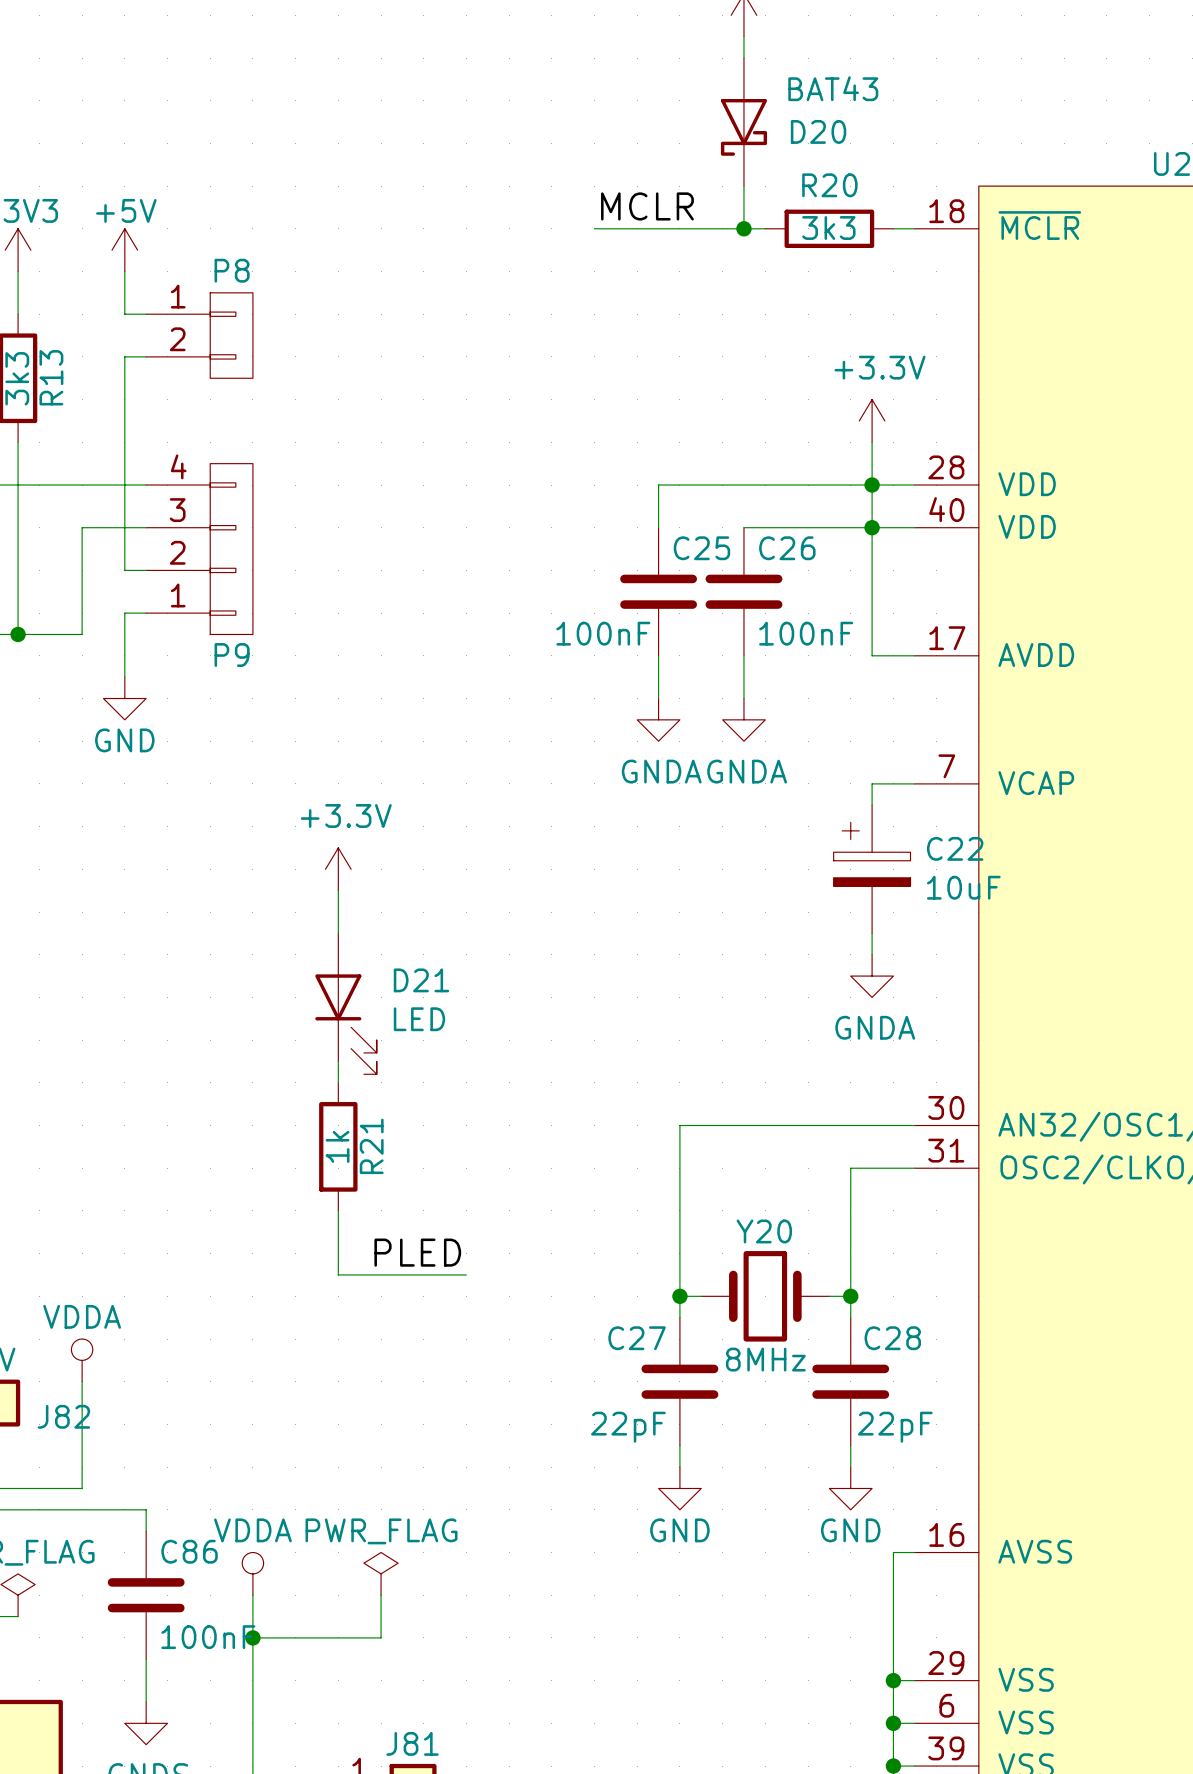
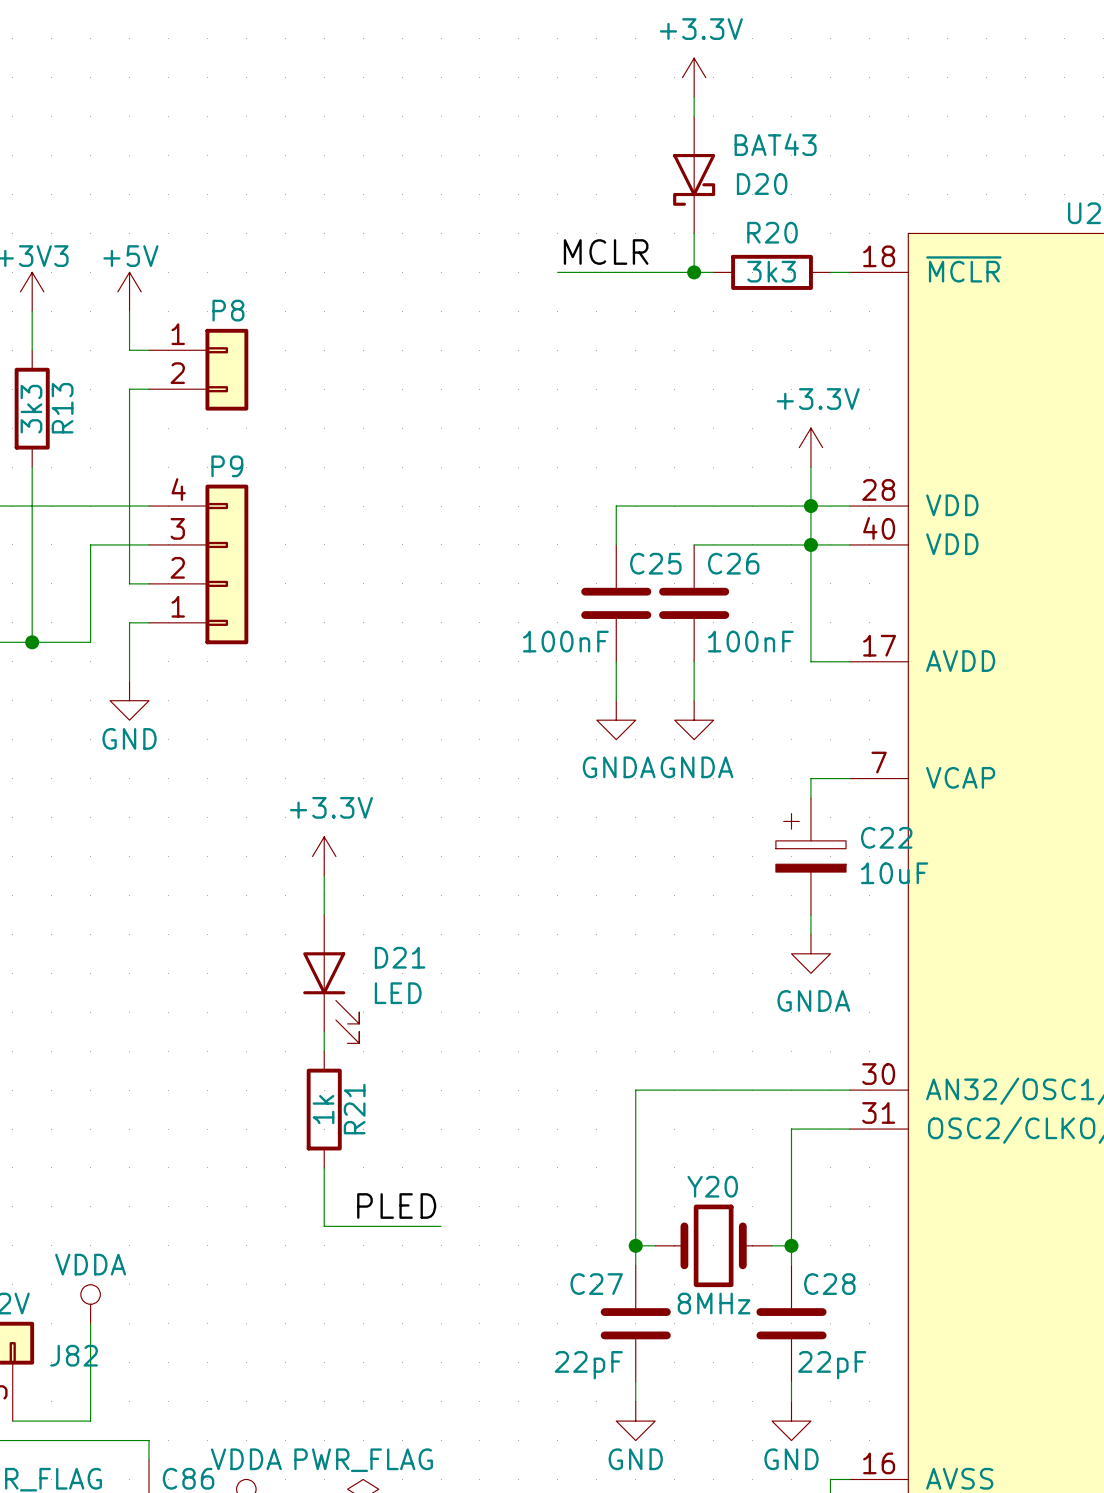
P8 symbol: [146, 292, 253, 379] -> [149, 328, 249, 411]
P9 symbol: [146, 463, 253, 635] -> [149, 484, 249, 645]
P9 name position: P9 (232, 655) -> P9 (227, 466)

